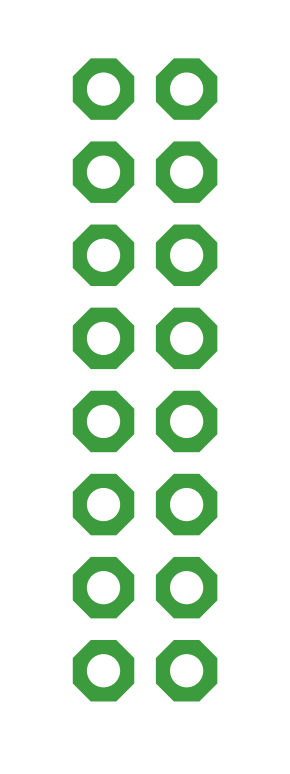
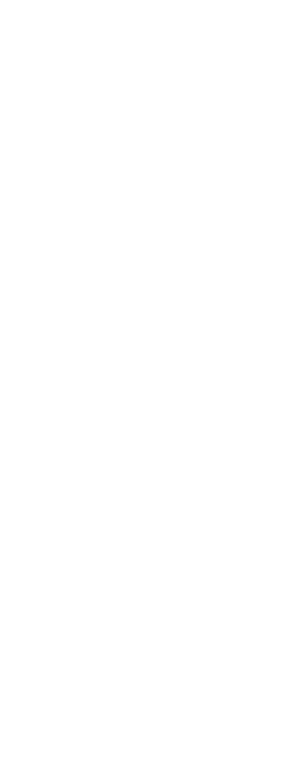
part: (145, 379) -> none

